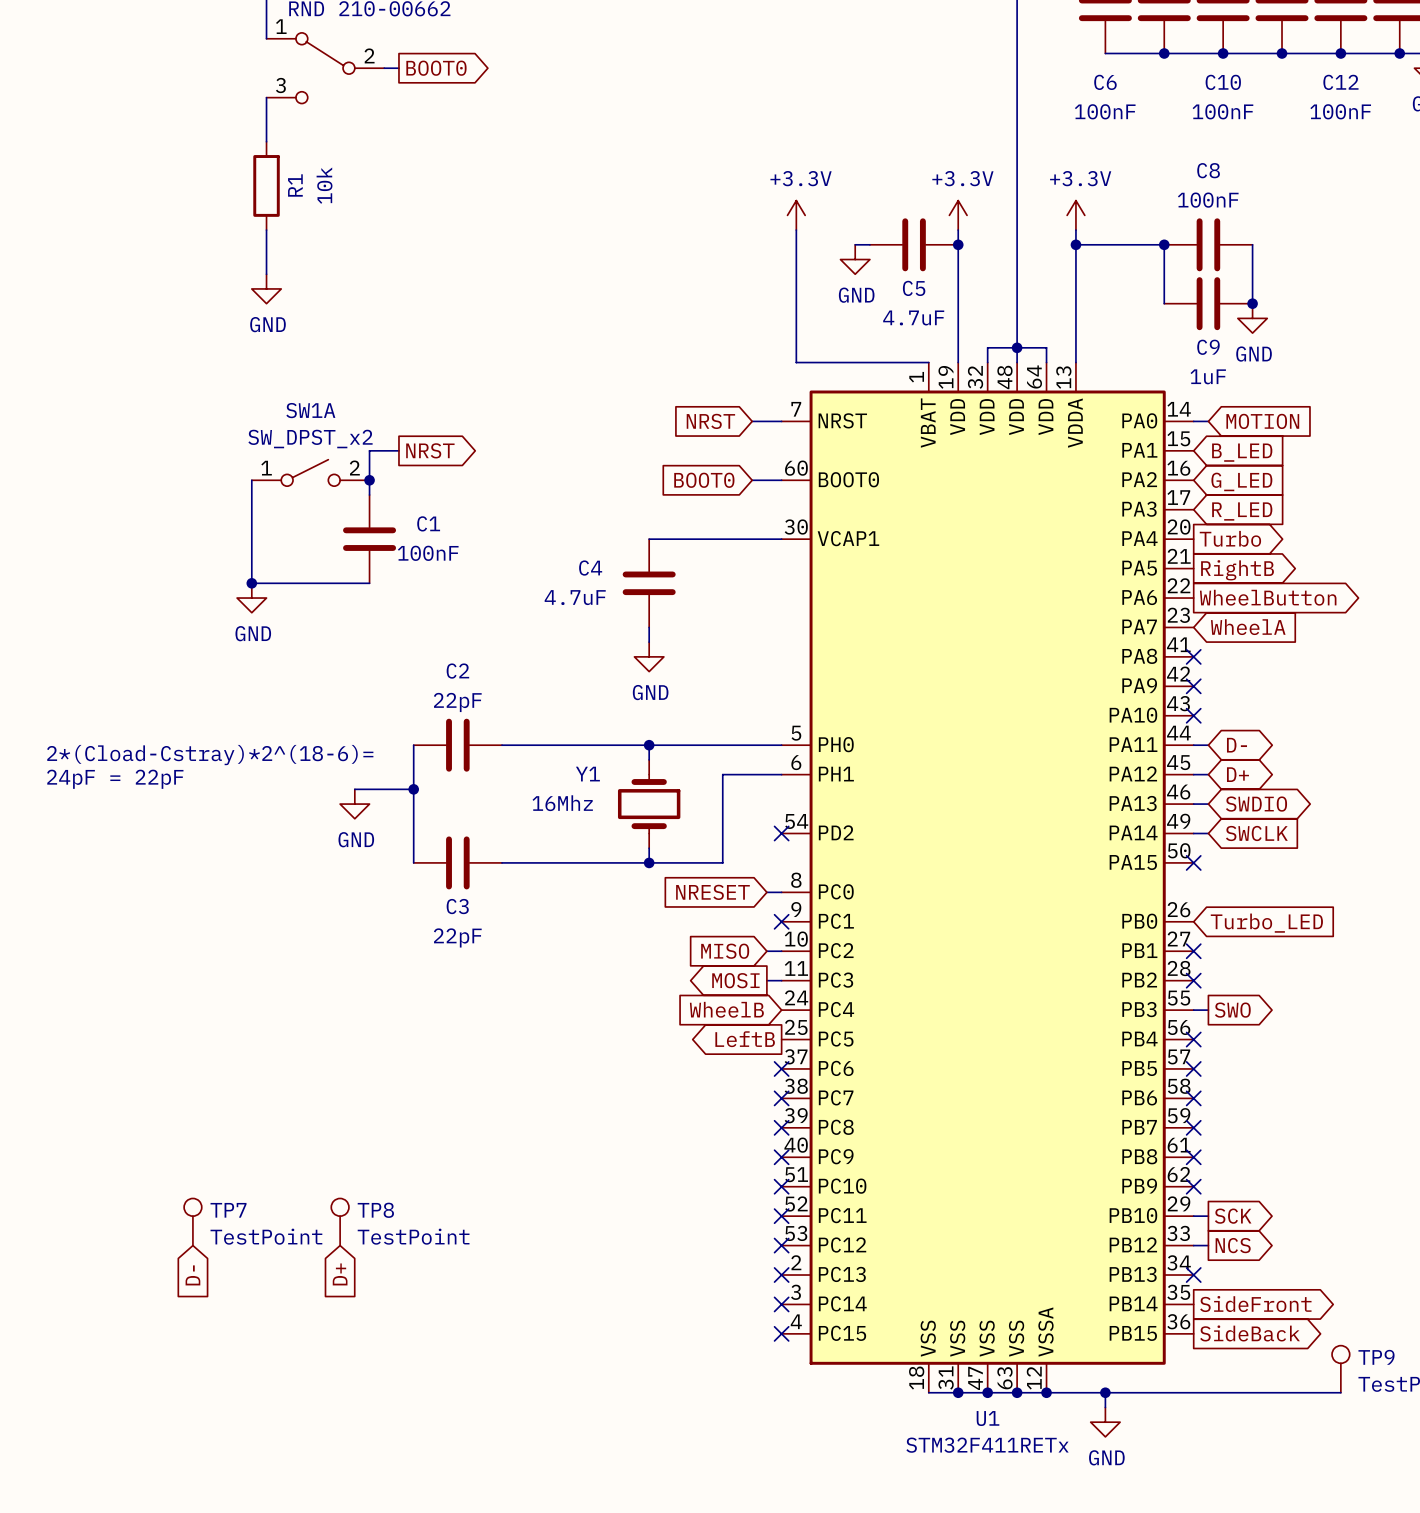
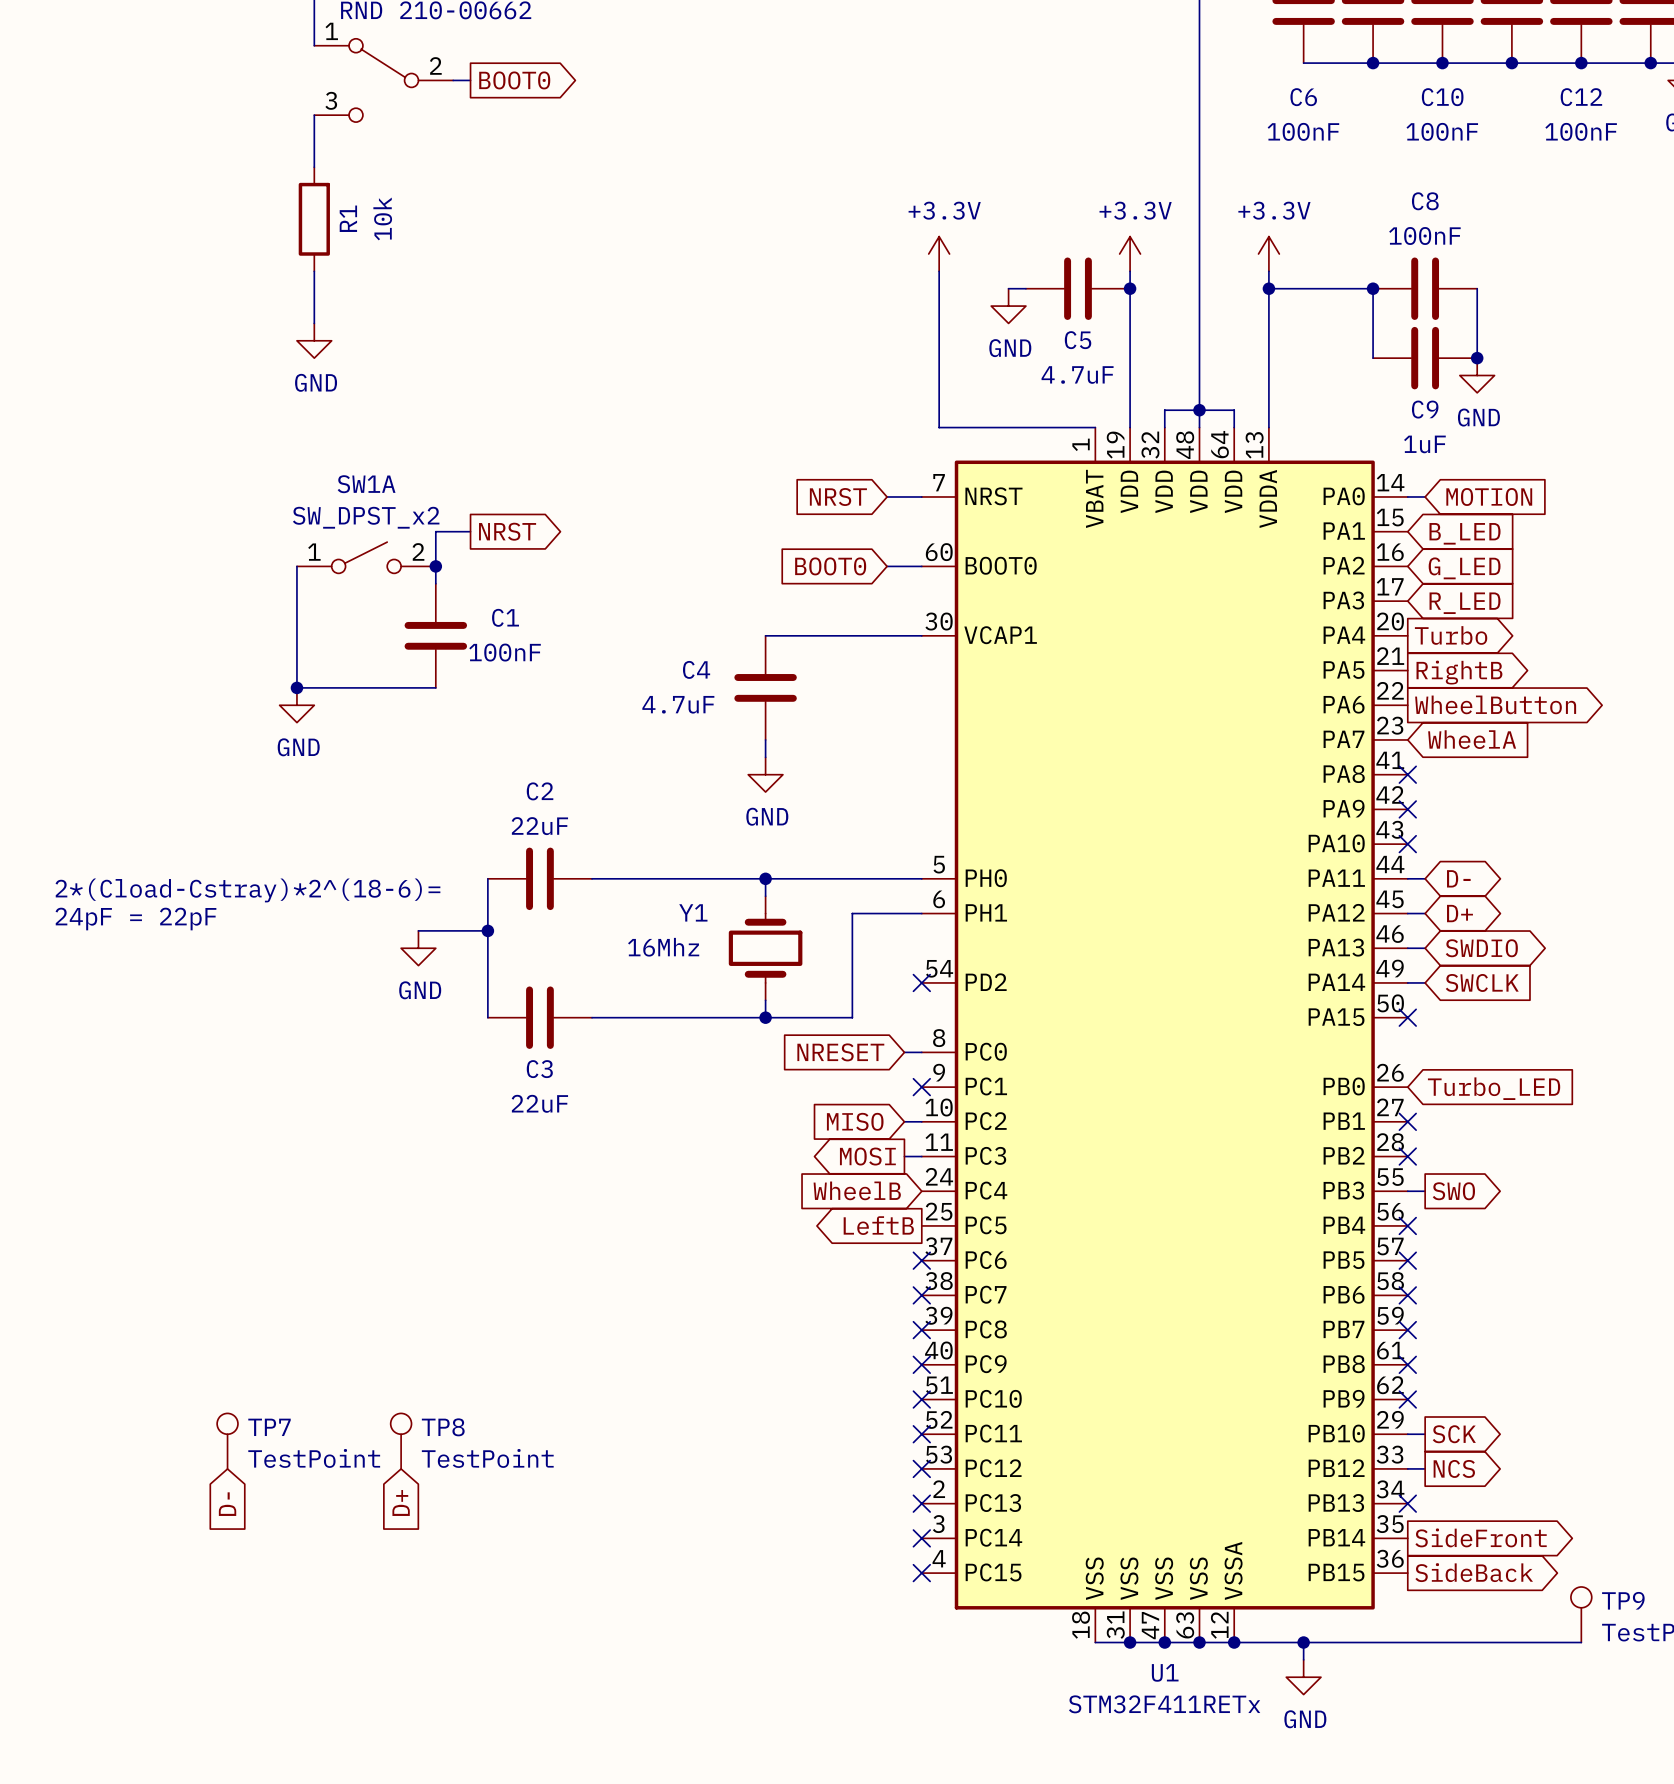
C2 value: 22pF (457, 702) -> 22uF (539, 826)
C3 value: 22pF (457, 937) -> 22uF (539, 1103)

